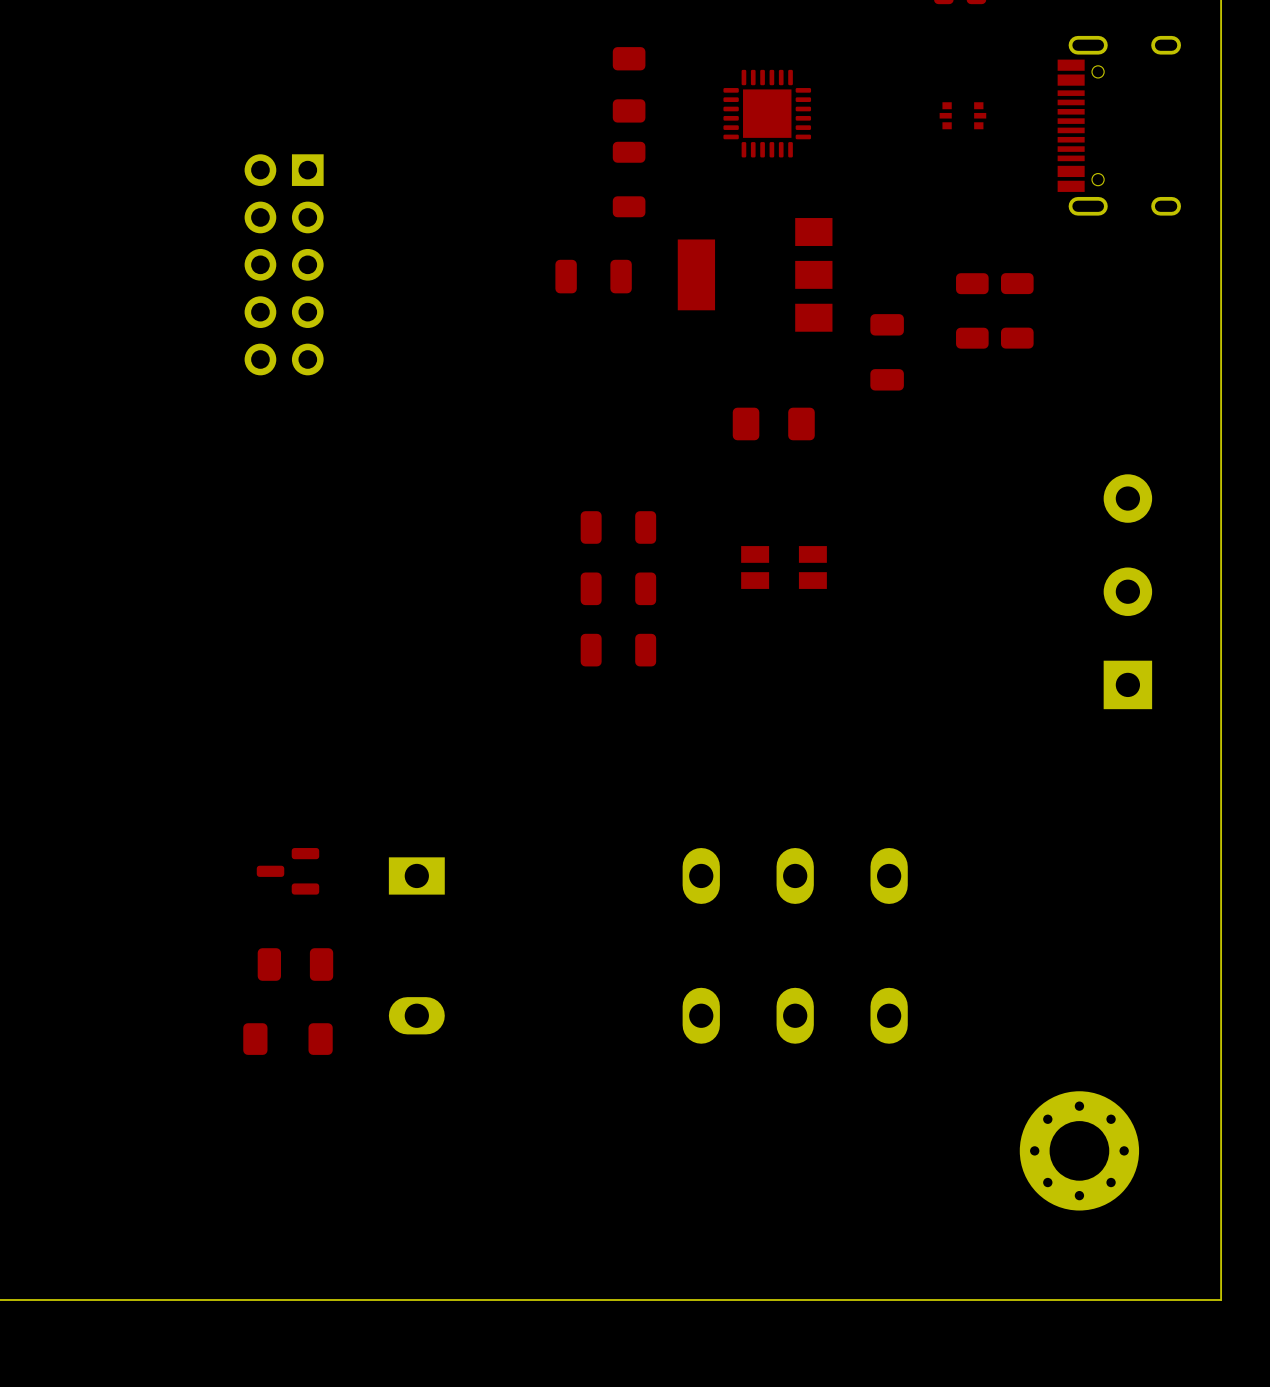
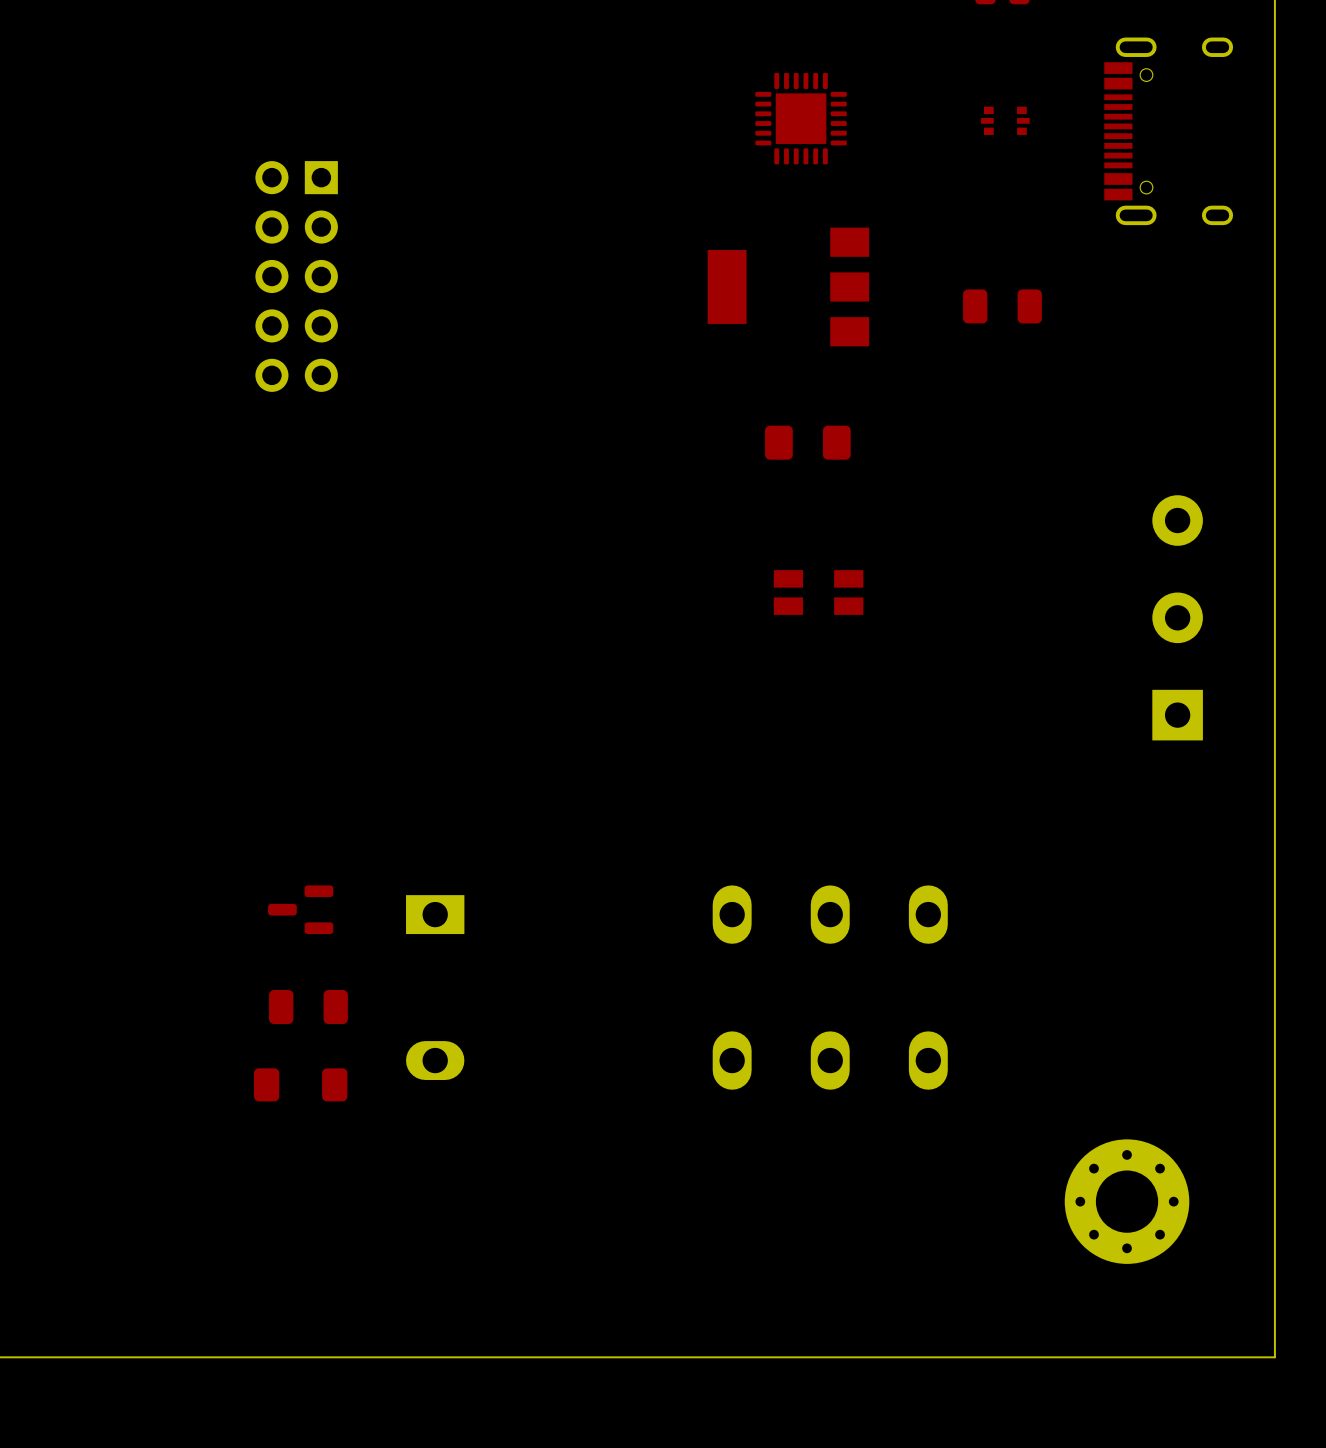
part rotation: 0° (629, 84) -> 90° clockwise (1002, 306)
part position: (629, 84) -> (1002, 306)
part: (629, 179) -> none
part: (593, 276) -> none
part: (972, 310) -> none
part: (1017, 310) -> none
part: (887, 352) -> none
part: (618, 527) -> none
part: (618, 588) -> none
part: (618, 650) -> none

